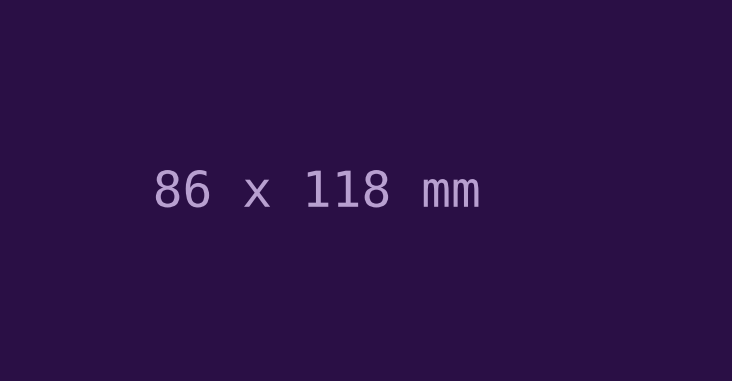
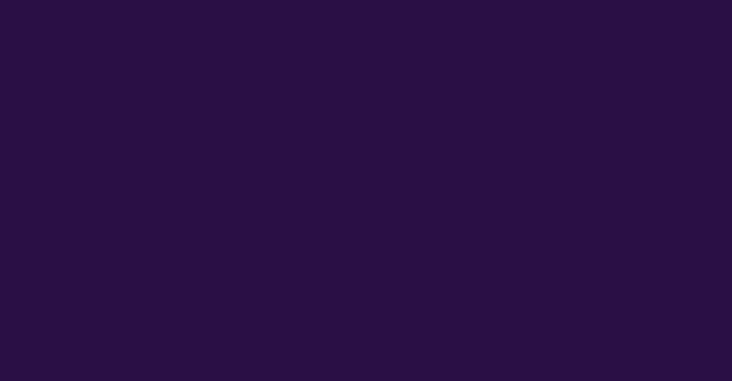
text: 86 x 118 mm (317, 188) -> none

